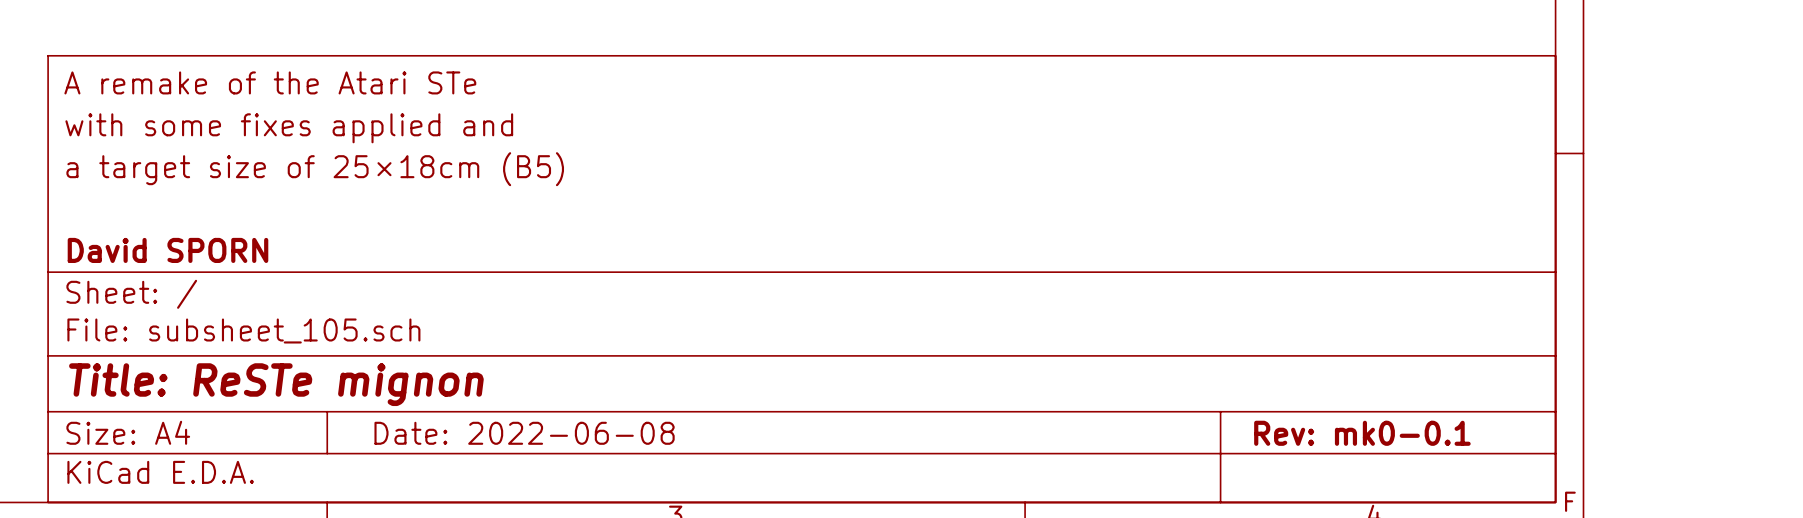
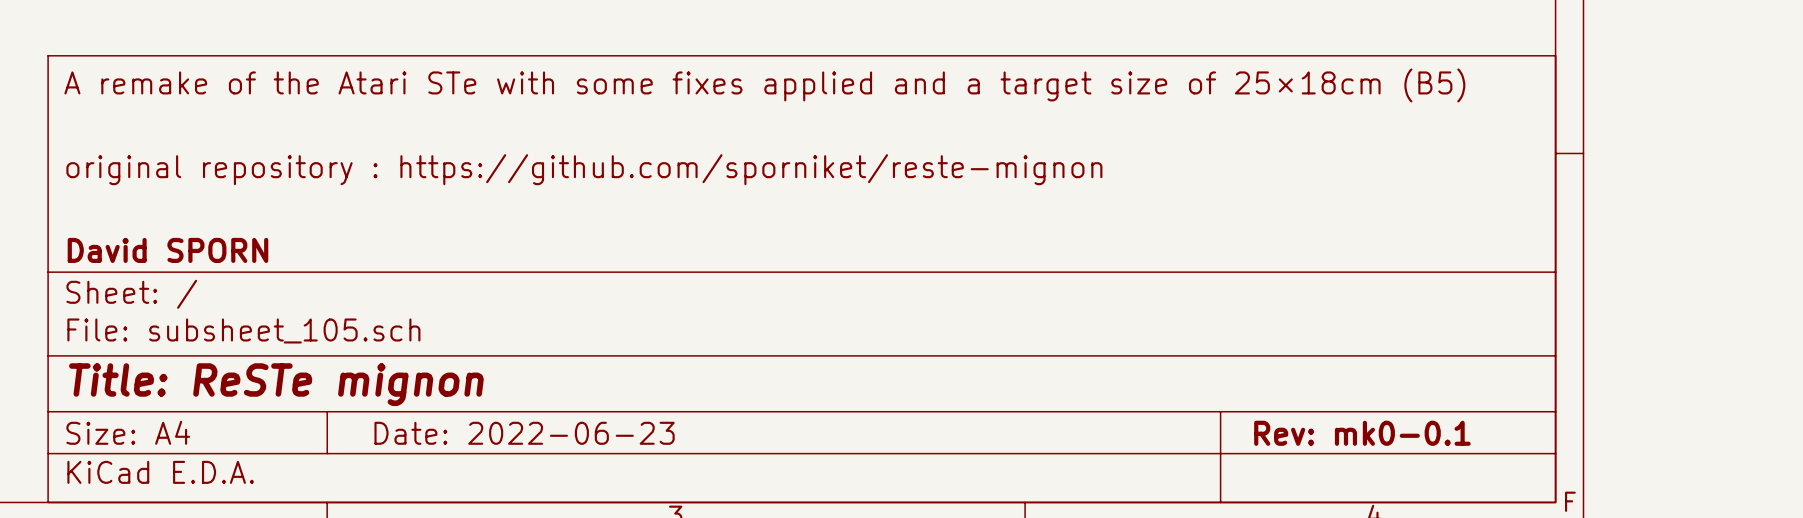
title block: A remake of the Atari STe (270, 82) -> A remake of the Atari STe with some fixes applied and a target size of 25×18cm (B5) (764, 85)
title block: with some fixes applied and (289, 128) -> none
title block: a target size of 25×18cm (B5) (315, 169) -> original repository : https://github.com/sporniket/reste-mignon (584, 169)
title block: Date: 2022-06-08 (524, 433) -> Date: 2022-06-23 (524, 433)

